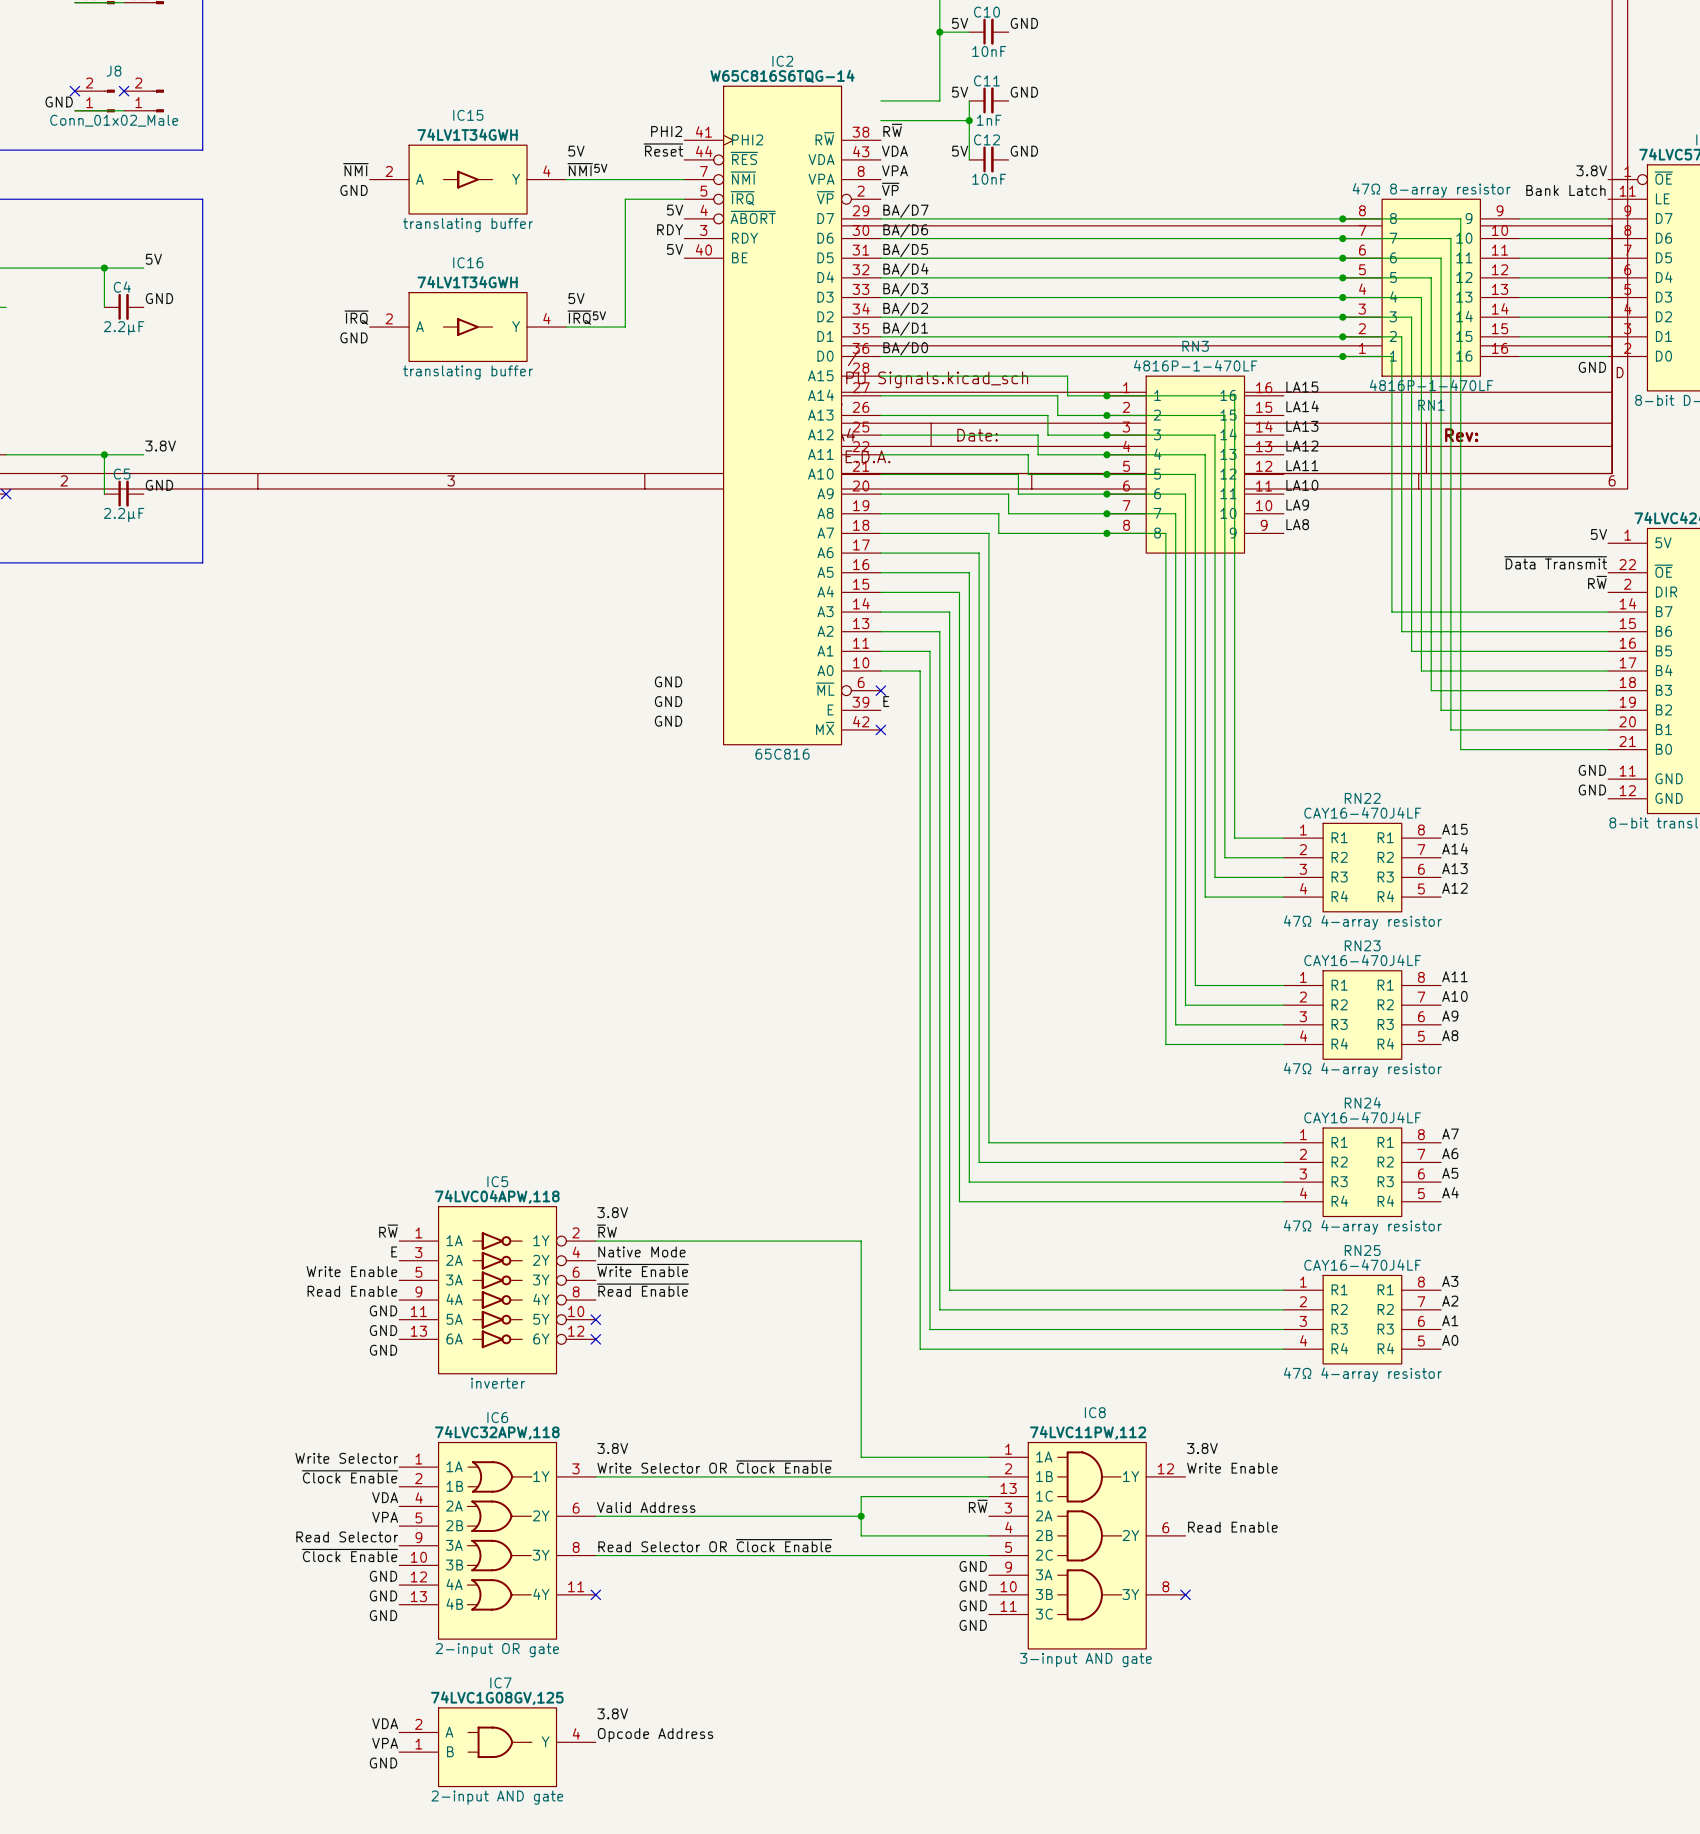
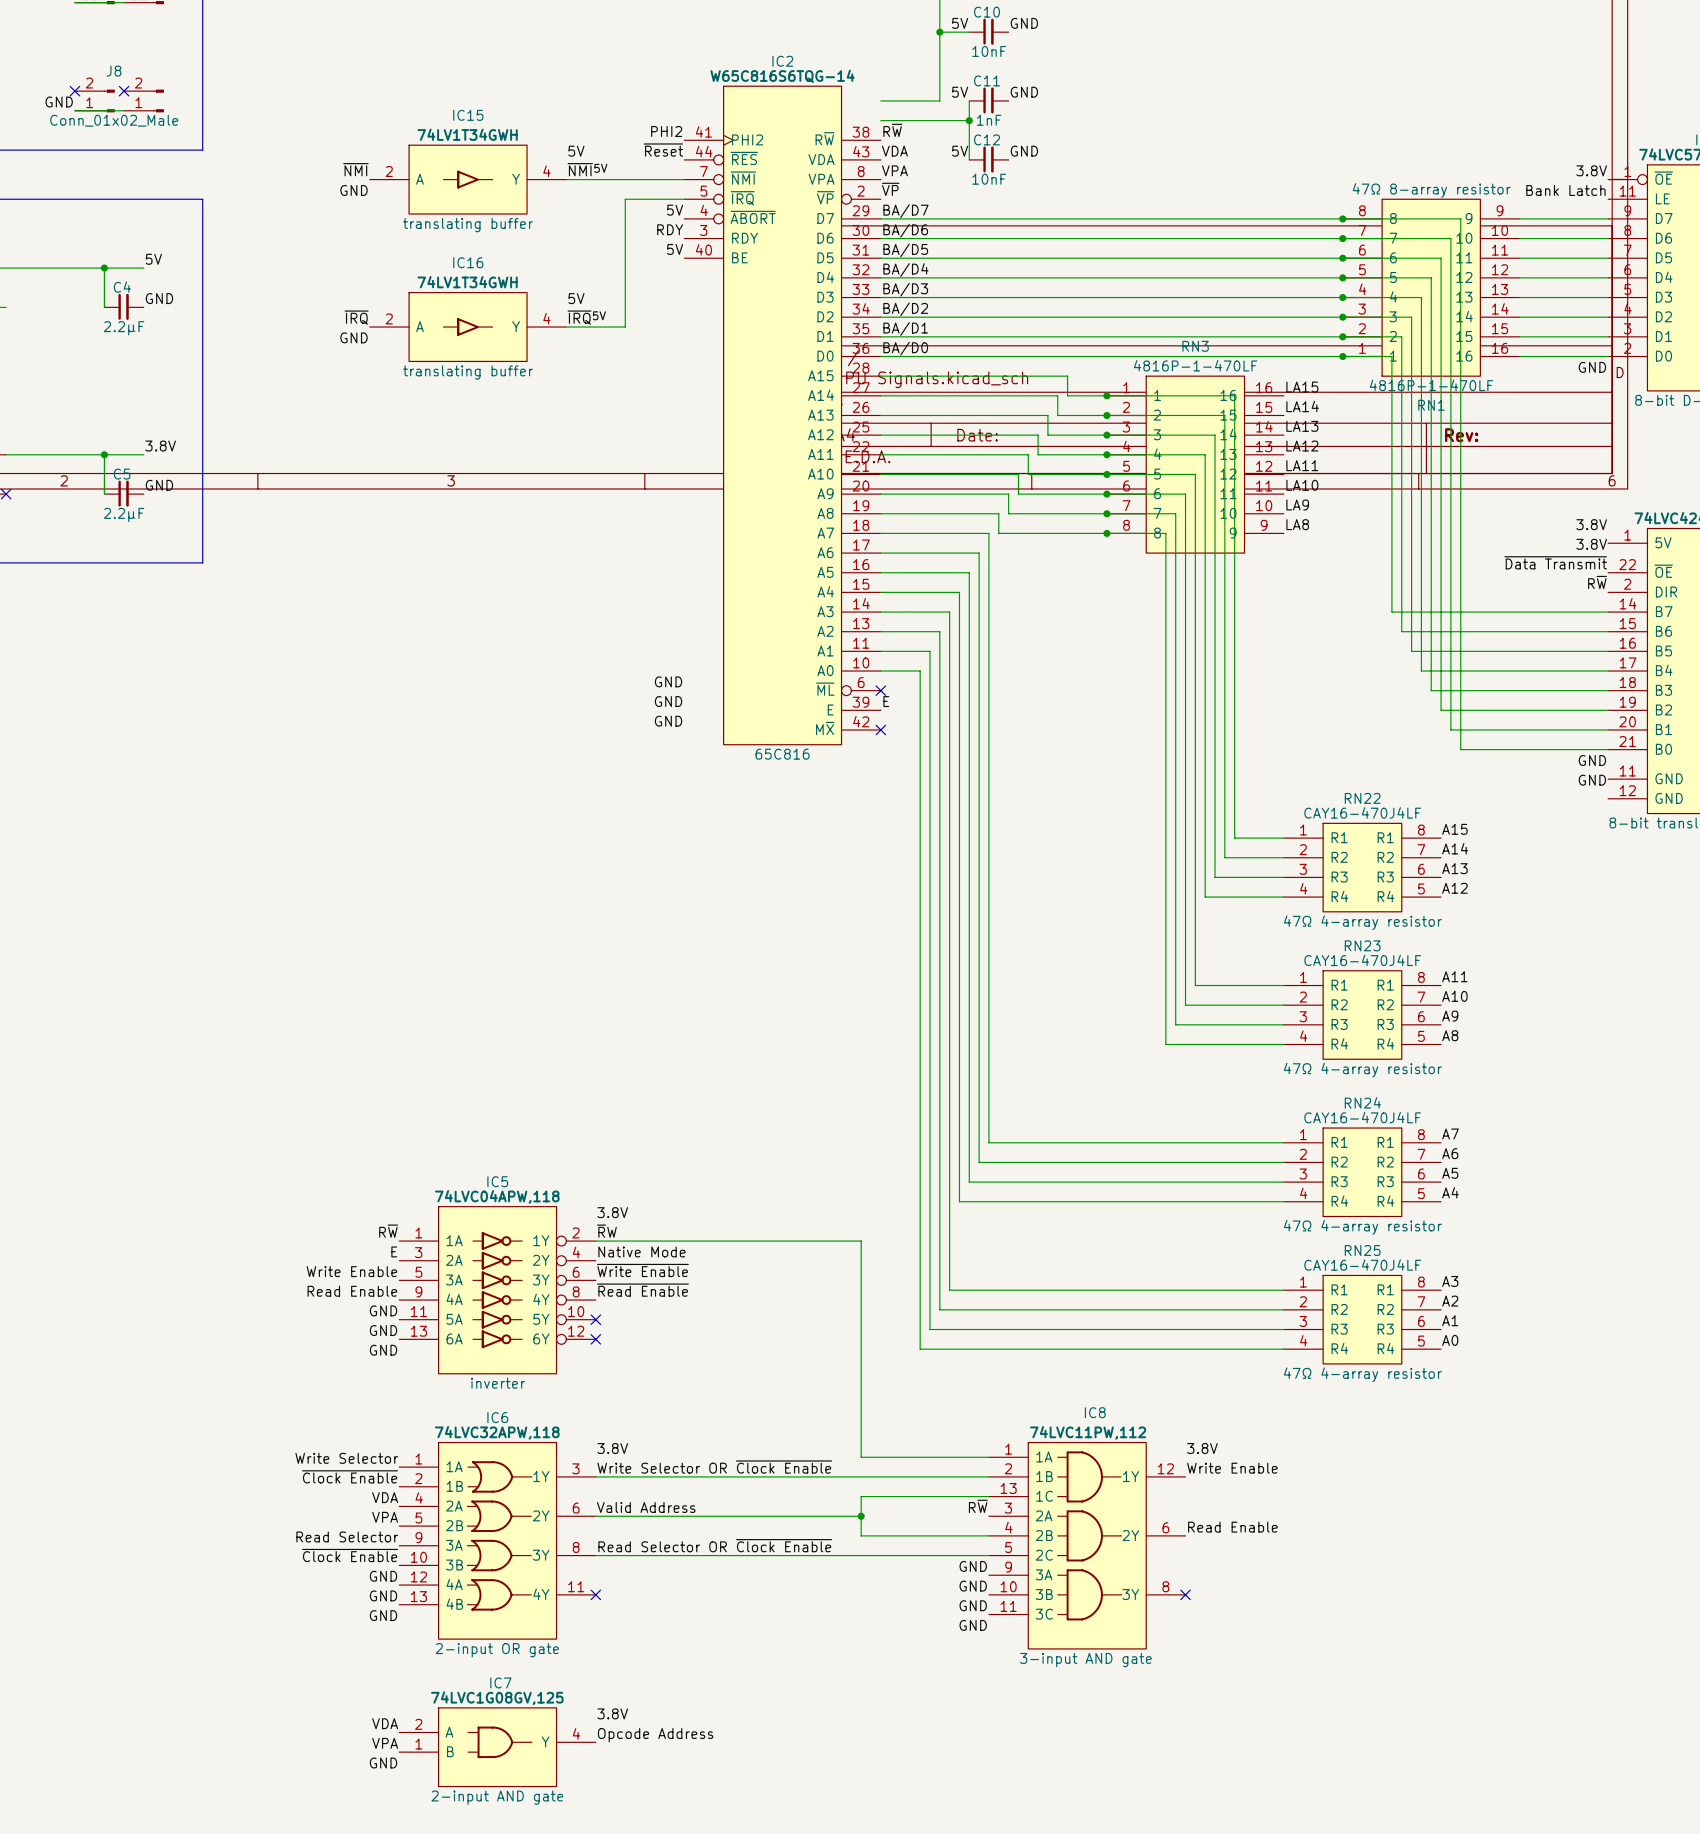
label: none -> 3.8V (1591, 524)
label: 5V (1598, 534) -> none
label: none -> 3.8V (1591, 544)
label: none -> GND (1592, 760)
label: GND (1592, 770) -> none
label: none -> GND (1592, 780)
label: GND (1592, 790) -> none

